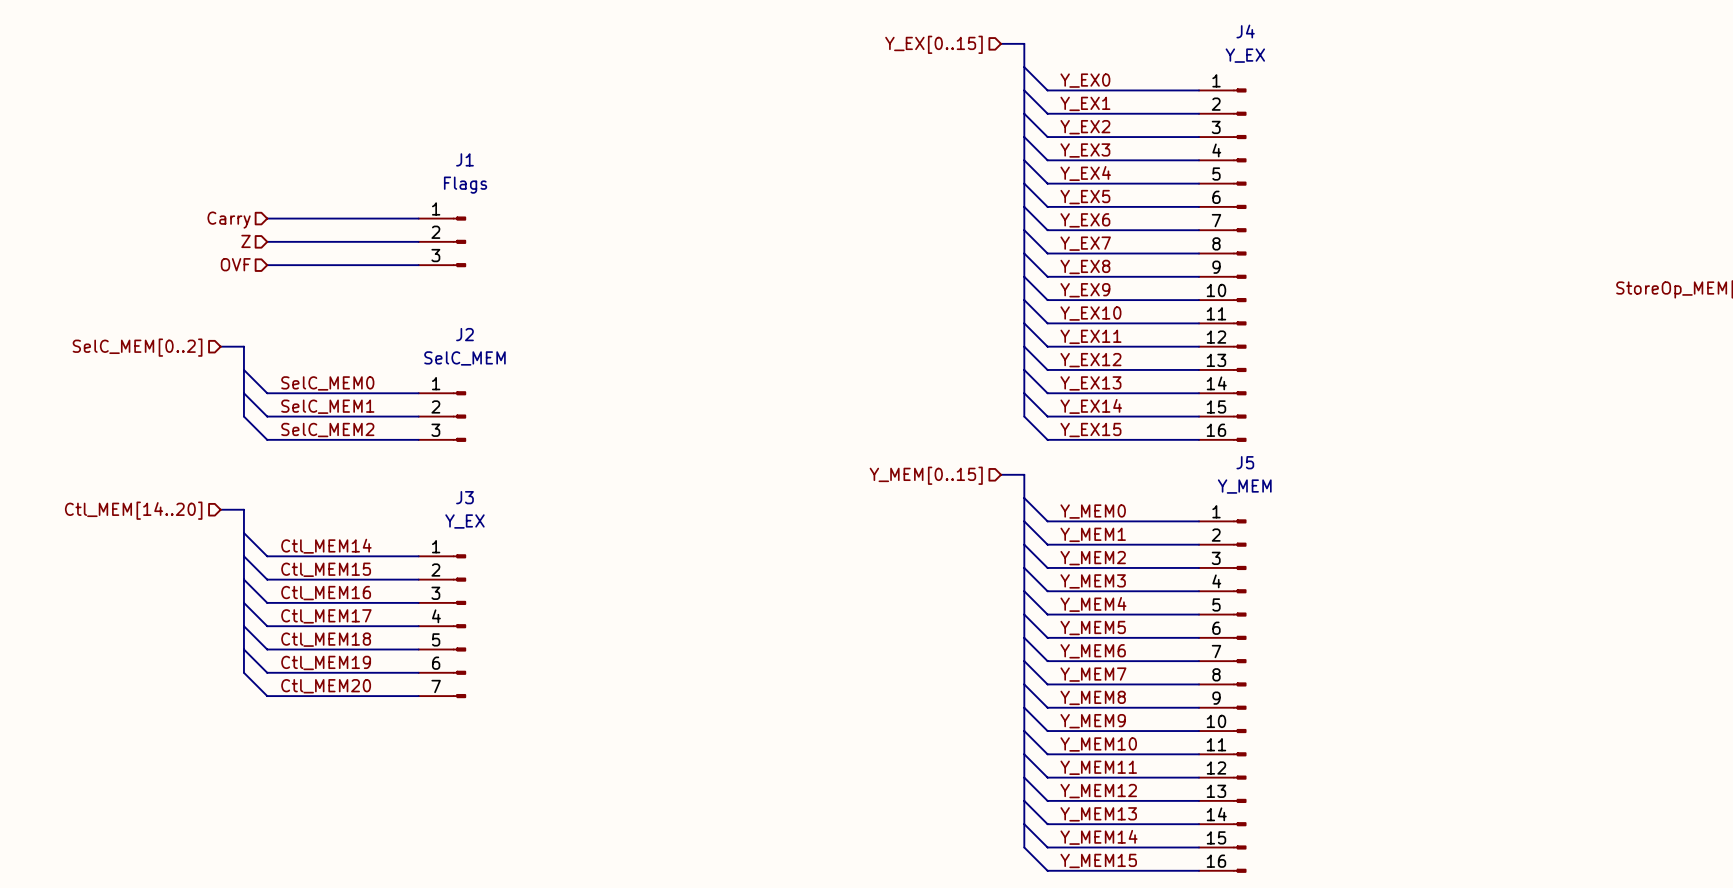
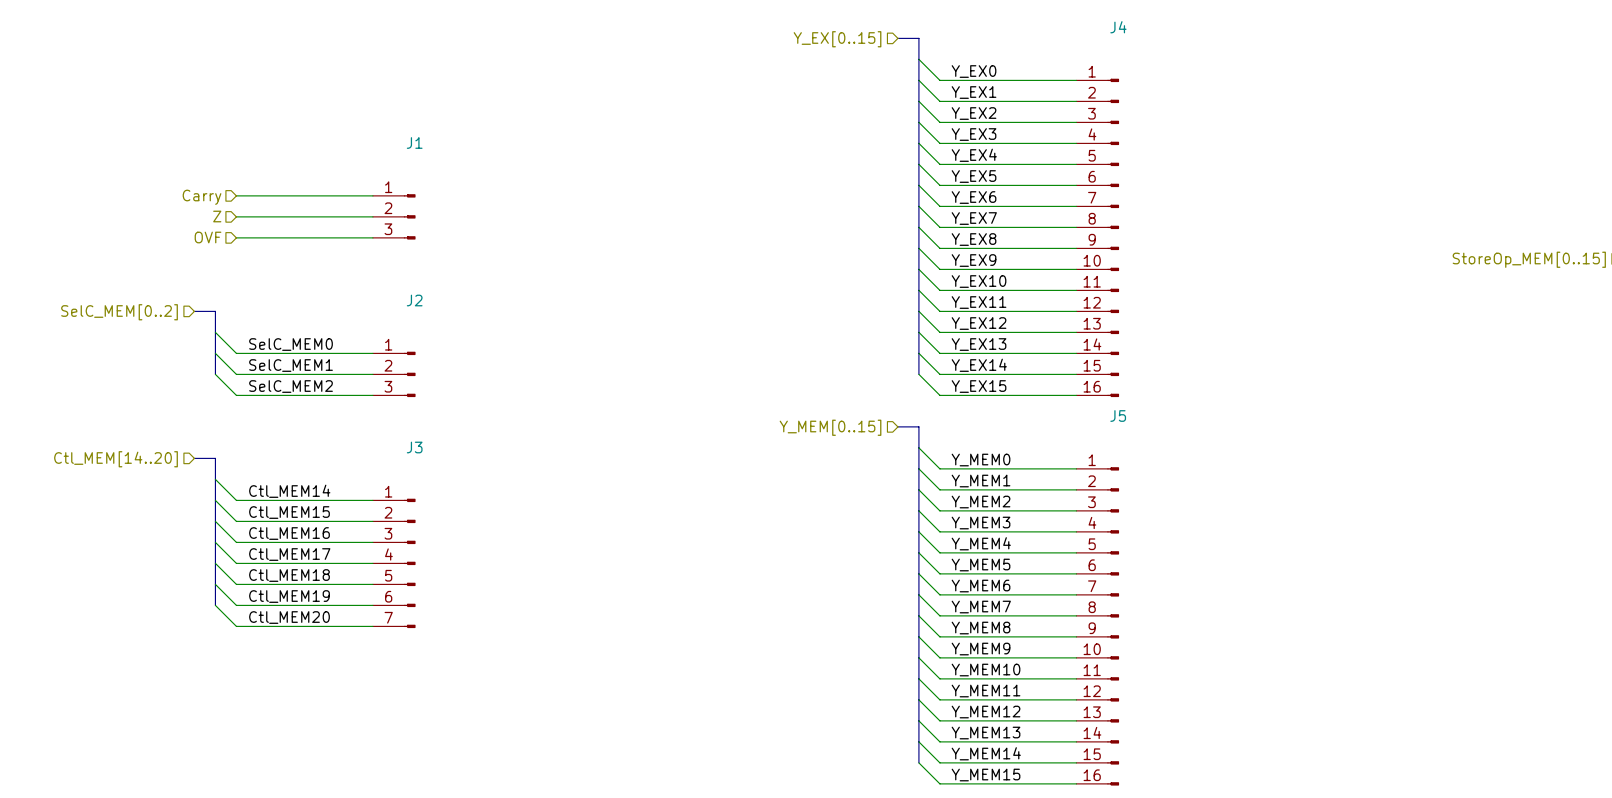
J4 value: Y_EX (1245, 55) -> none
J1 value: Flags (465, 185) -> none
J2 value: SelC_MEM (464, 358) -> none
J5 value: Y_MEM (1244, 486) -> none
J3 value: Y_EX (464, 521) -> none

